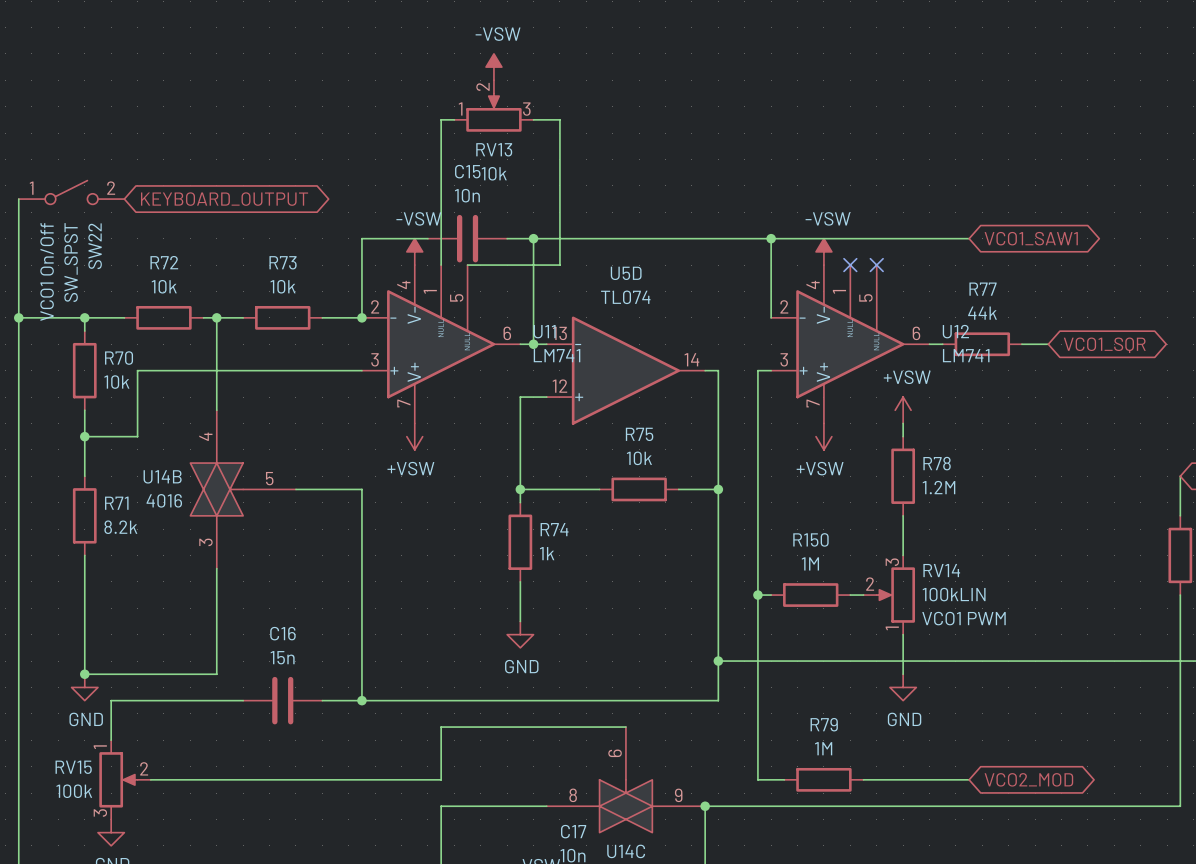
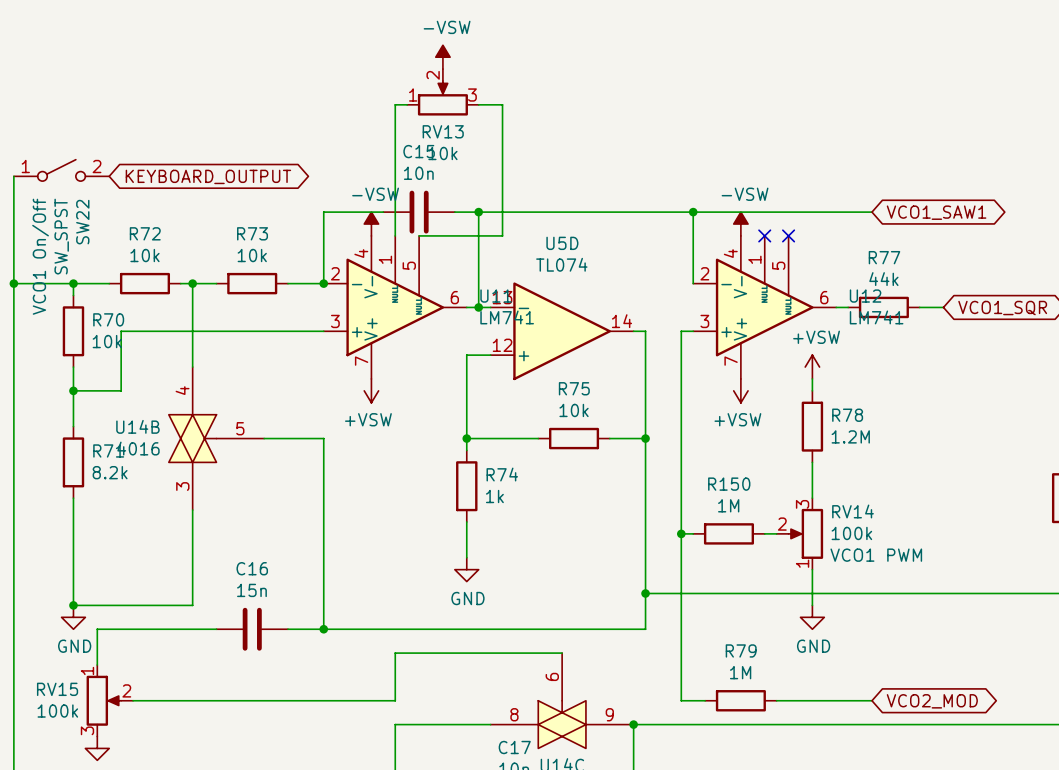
RV14 value: 100kLIN (954, 594) -> 100k (851, 533)

